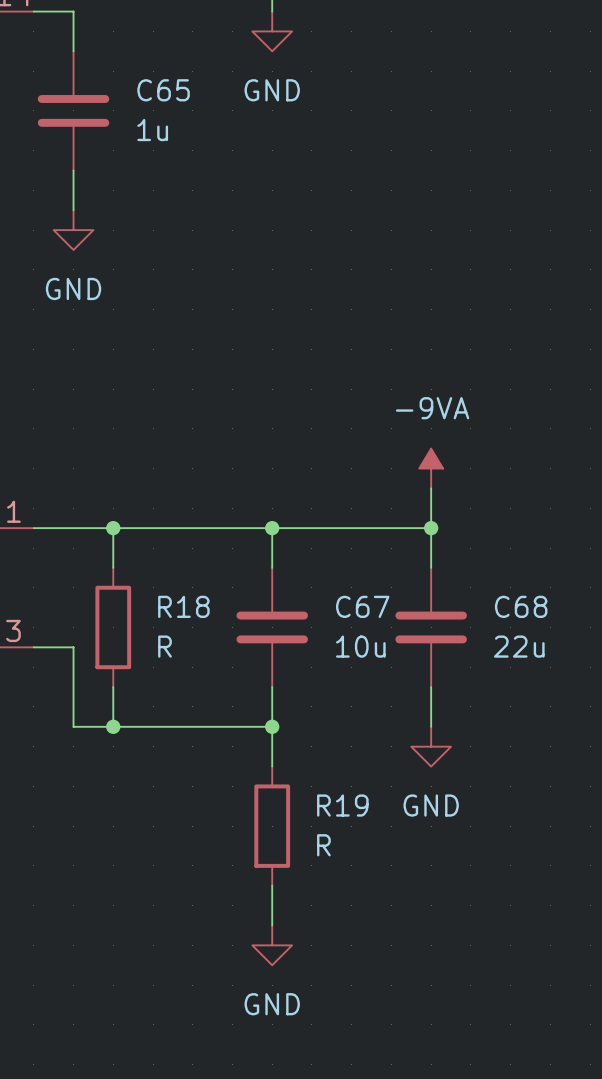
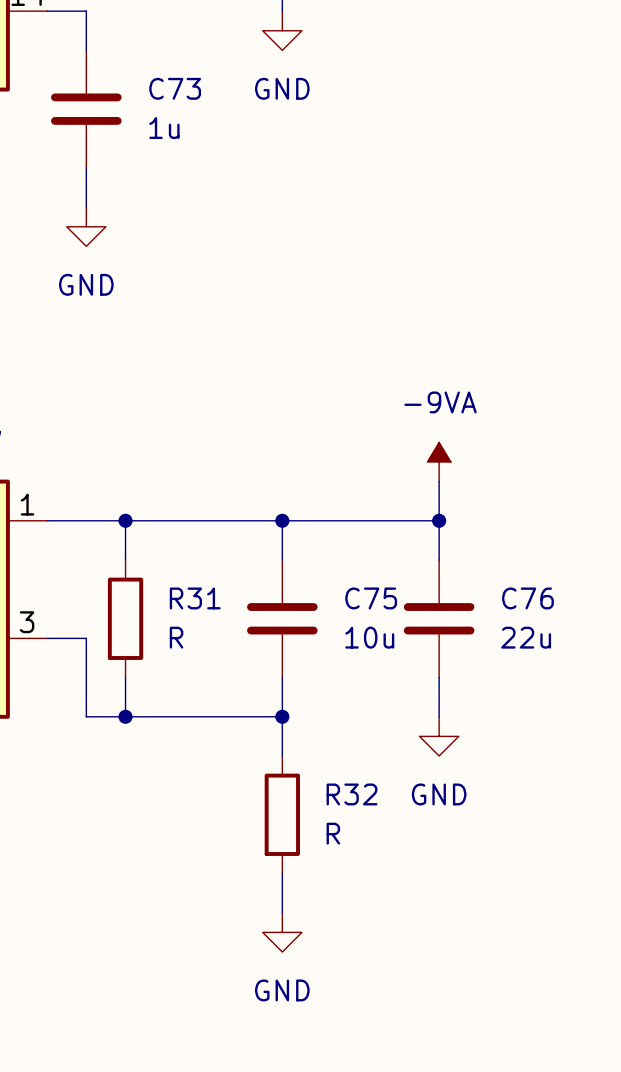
C65 name: C65 (163, 90) -> C73 (175, 88)
R18 name: R18 (183, 606) -> R31 (195, 598)
C67 name: C67 (362, 606) -> C75 (371, 598)
C68 name: C68 (521, 606) -> C76 (527, 598)
R19 name: R19 (342, 805) -> R32 (352, 794)

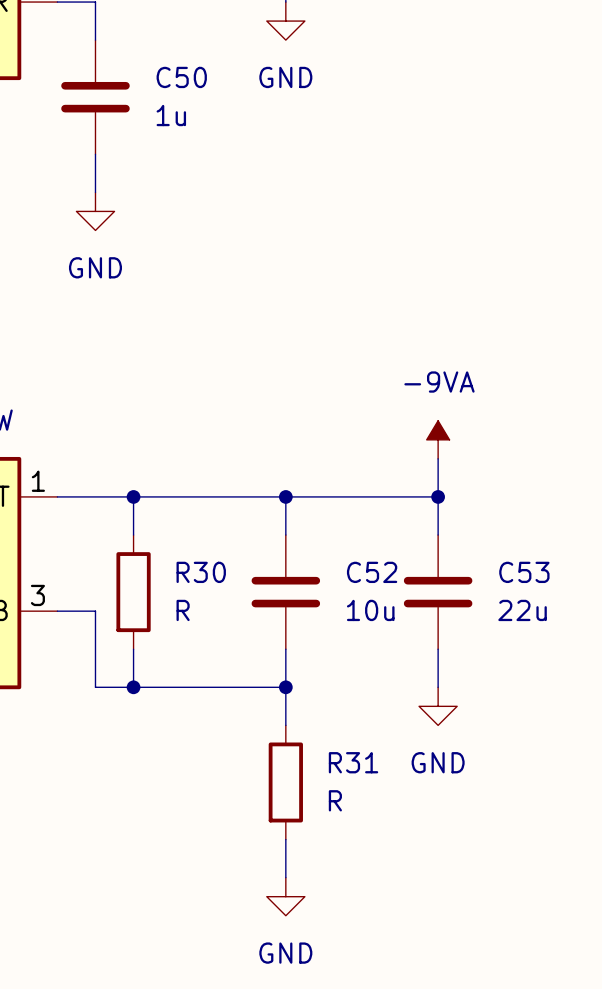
C73 name: C73 (175, 88) -> C50 (181, 77)
R31 name: R31 (195, 598) -> R30 (201, 572)
C75 name: C75 (371, 598) -> C52 (372, 572)
C76 name: C76 (527, 598) -> C53 (524, 572)
R32 name: R32 (352, 794) -> R31 (353, 762)

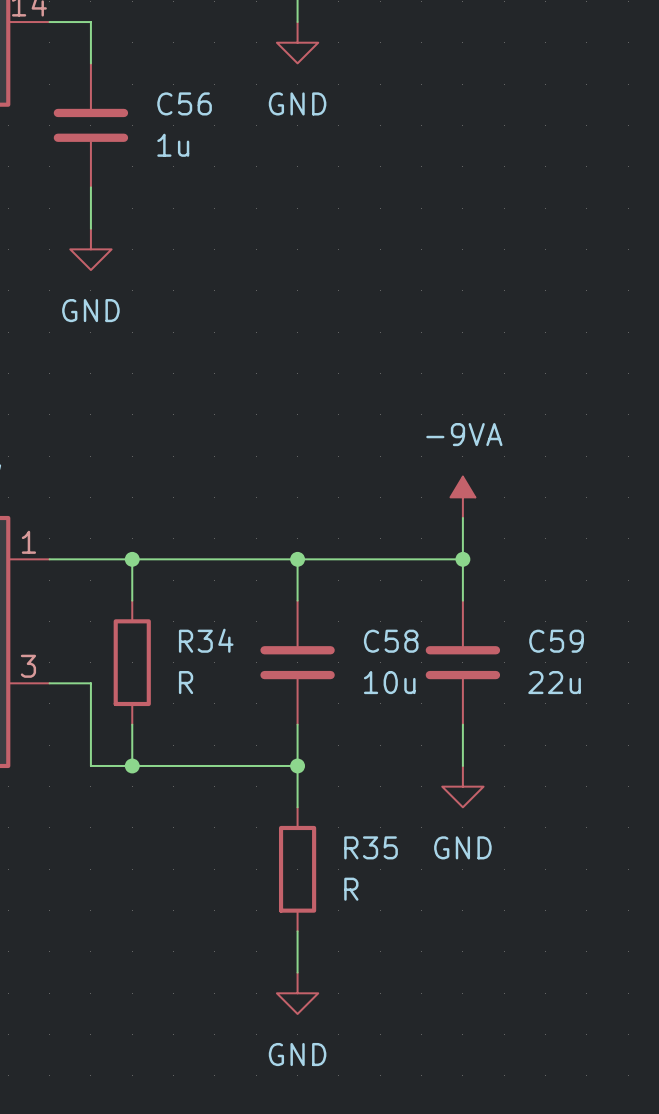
C50 name: C50 (181, 77) -> C56 (184, 103)
R30 name: R30 (201, 572) -> R34 (206, 640)
C52 name: C52 (372, 572) -> C58 (391, 641)
C53 name: C53 (524, 572) -> C59 (556, 641)
R31 name: R31 (353, 762) -> R35 (371, 847)

